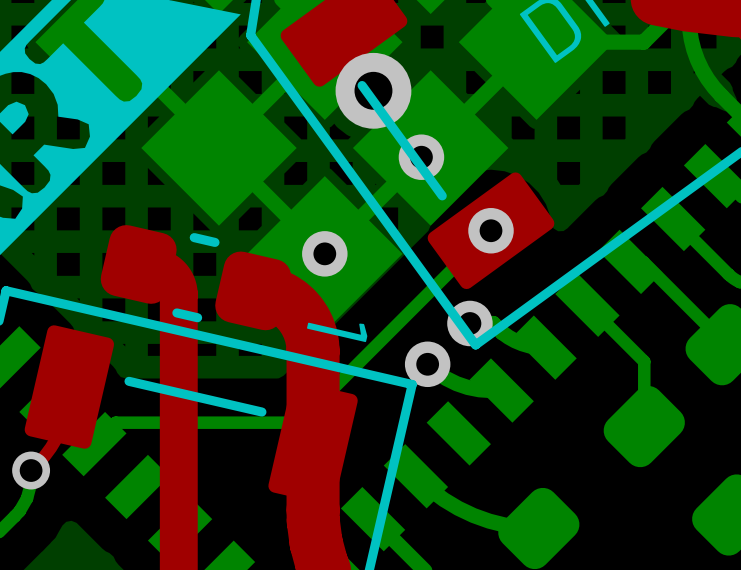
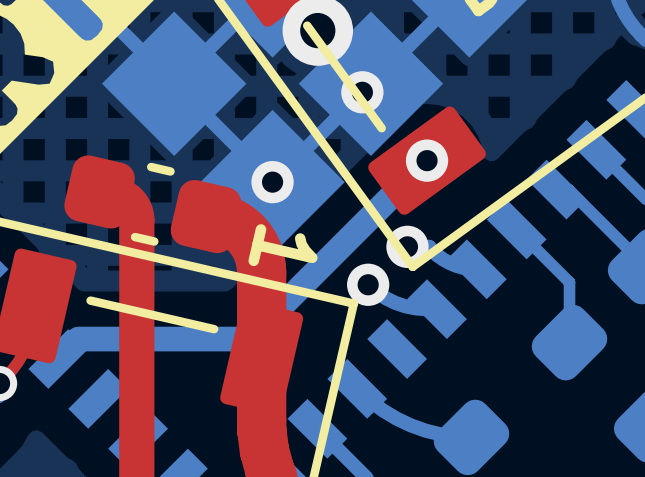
bottom track width: thin (491, 230) (299, 422) (115, 422) -> thick (427, 160) (248, 339) (78, 339)

